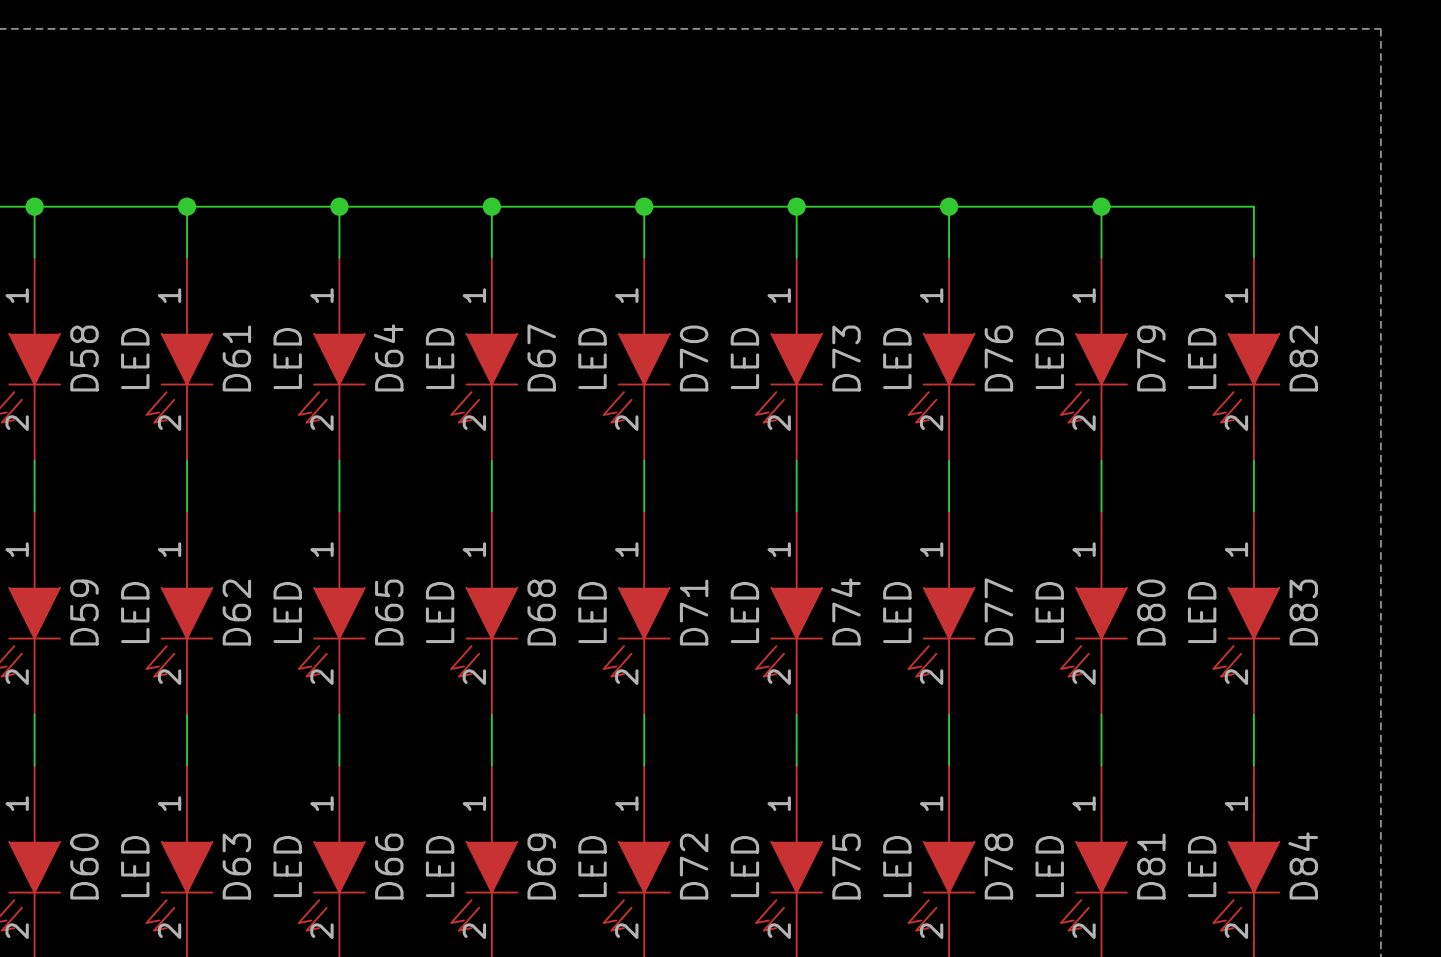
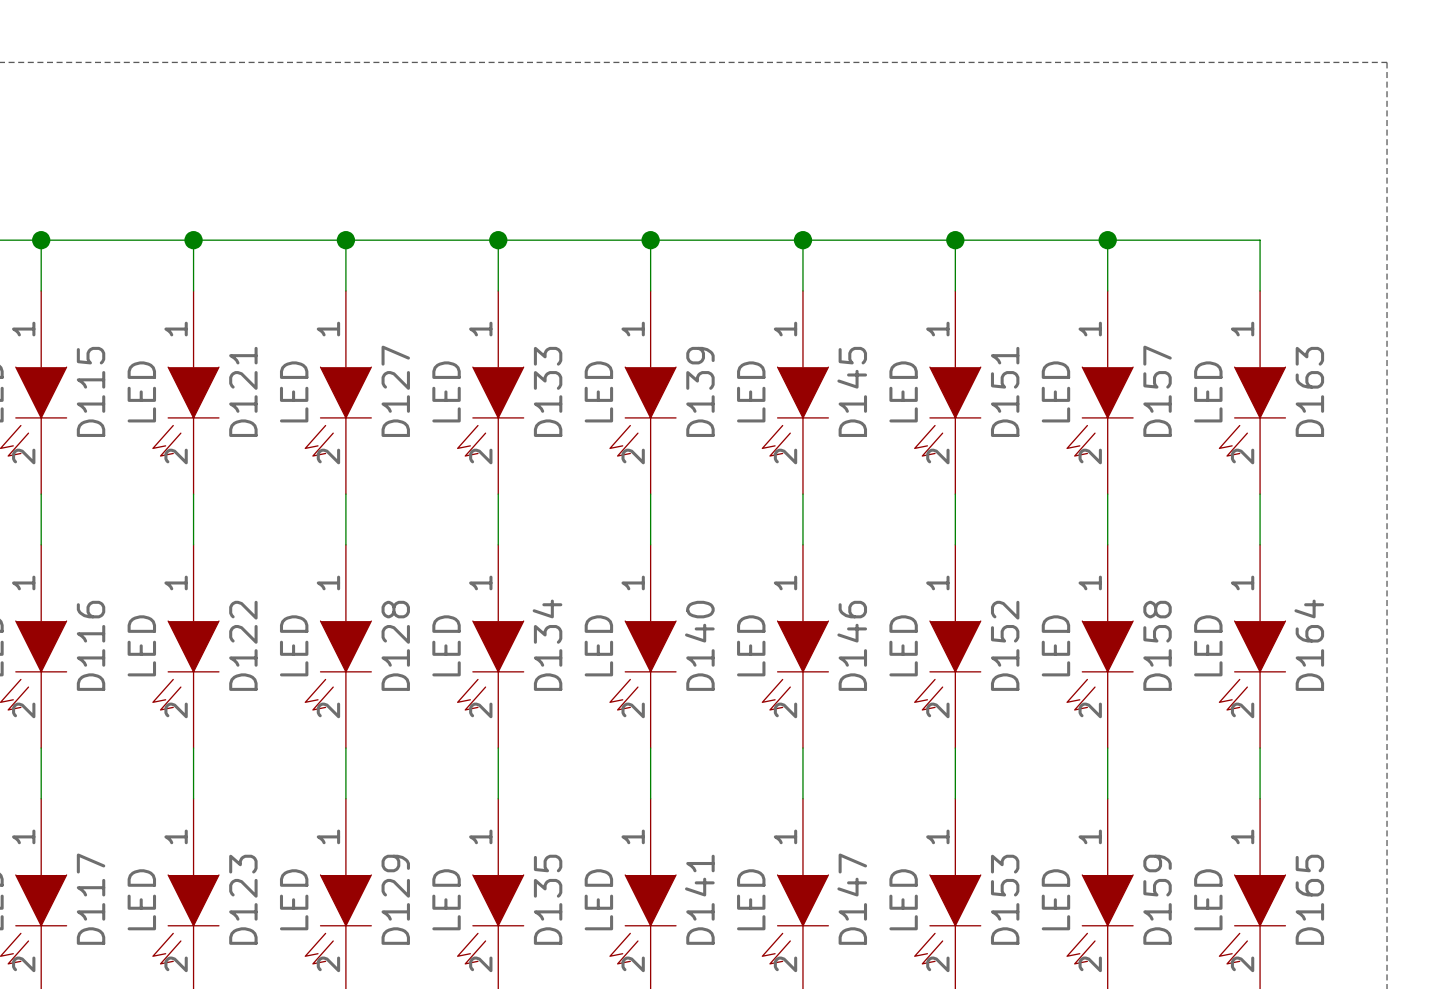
D64 name: D64 (388, 357) -> D127 (395, 391)
D67 name: D67 (541, 357) -> D133 (548, 391)
D58 name: D58 (84, 358) -> D115 (91, 391)
D61 name: D61 (236, 358) -> D121 (243, 391)
D70 name: D70 (694, 358) -> D139 (700, 391)
D73 name: D73 (846, 358) -> D145 (852, 391)
D76 name: D76 (998, 358) -> D151 (1005, 391)
D79 name: D79 (1151, 358) -> D157 (1157, 391)
D82 name: D82 (1303, 358) -> D163 (1309, 391)
D74 name: D74 (845, 611) -> D146 (852, 645)
D77 name: D77 (998, 611) -> D152 (1005, 645)
D59 name: D59 (84, 612) -> D116 (91, 645)
D62 name: D62 (236, 612) -> D122 (243, 645)
D65 name: D65 (389, 612) -> D128 (395, 645)
D68 name: D68 (541, 612) -> D134 (547, 645)
D71 name: D71 (694, 612) -> D140 (699, 645)
D80 name: D80 (1151, 612) -> D158 (1157, 645)
D83 name: D83 (1303, 612) -> D164 (1309, 645)
D84 name: D84 (1303, 865) -> D165 (1309, 899)
D60 name: D60 (84, 866) -> D117 (91, 899)
D63 name: D63 (236, 866) -> D123 (243, 899)
D66 name: D66 (389, 866) -> D129 (395, 899)
D69 name: D69 (541, 866) -> D135 (548, 899)
D72 name: D72 (694, 866) -> D141 (699, 899)
D75 name: D75 (846, 866) -> D147 (852, 899)
D78 name: D78 (998, 866) -> D153 (1005, 899)
D81 name: D81 (1151, 866) -> D159 (1157, 899)

